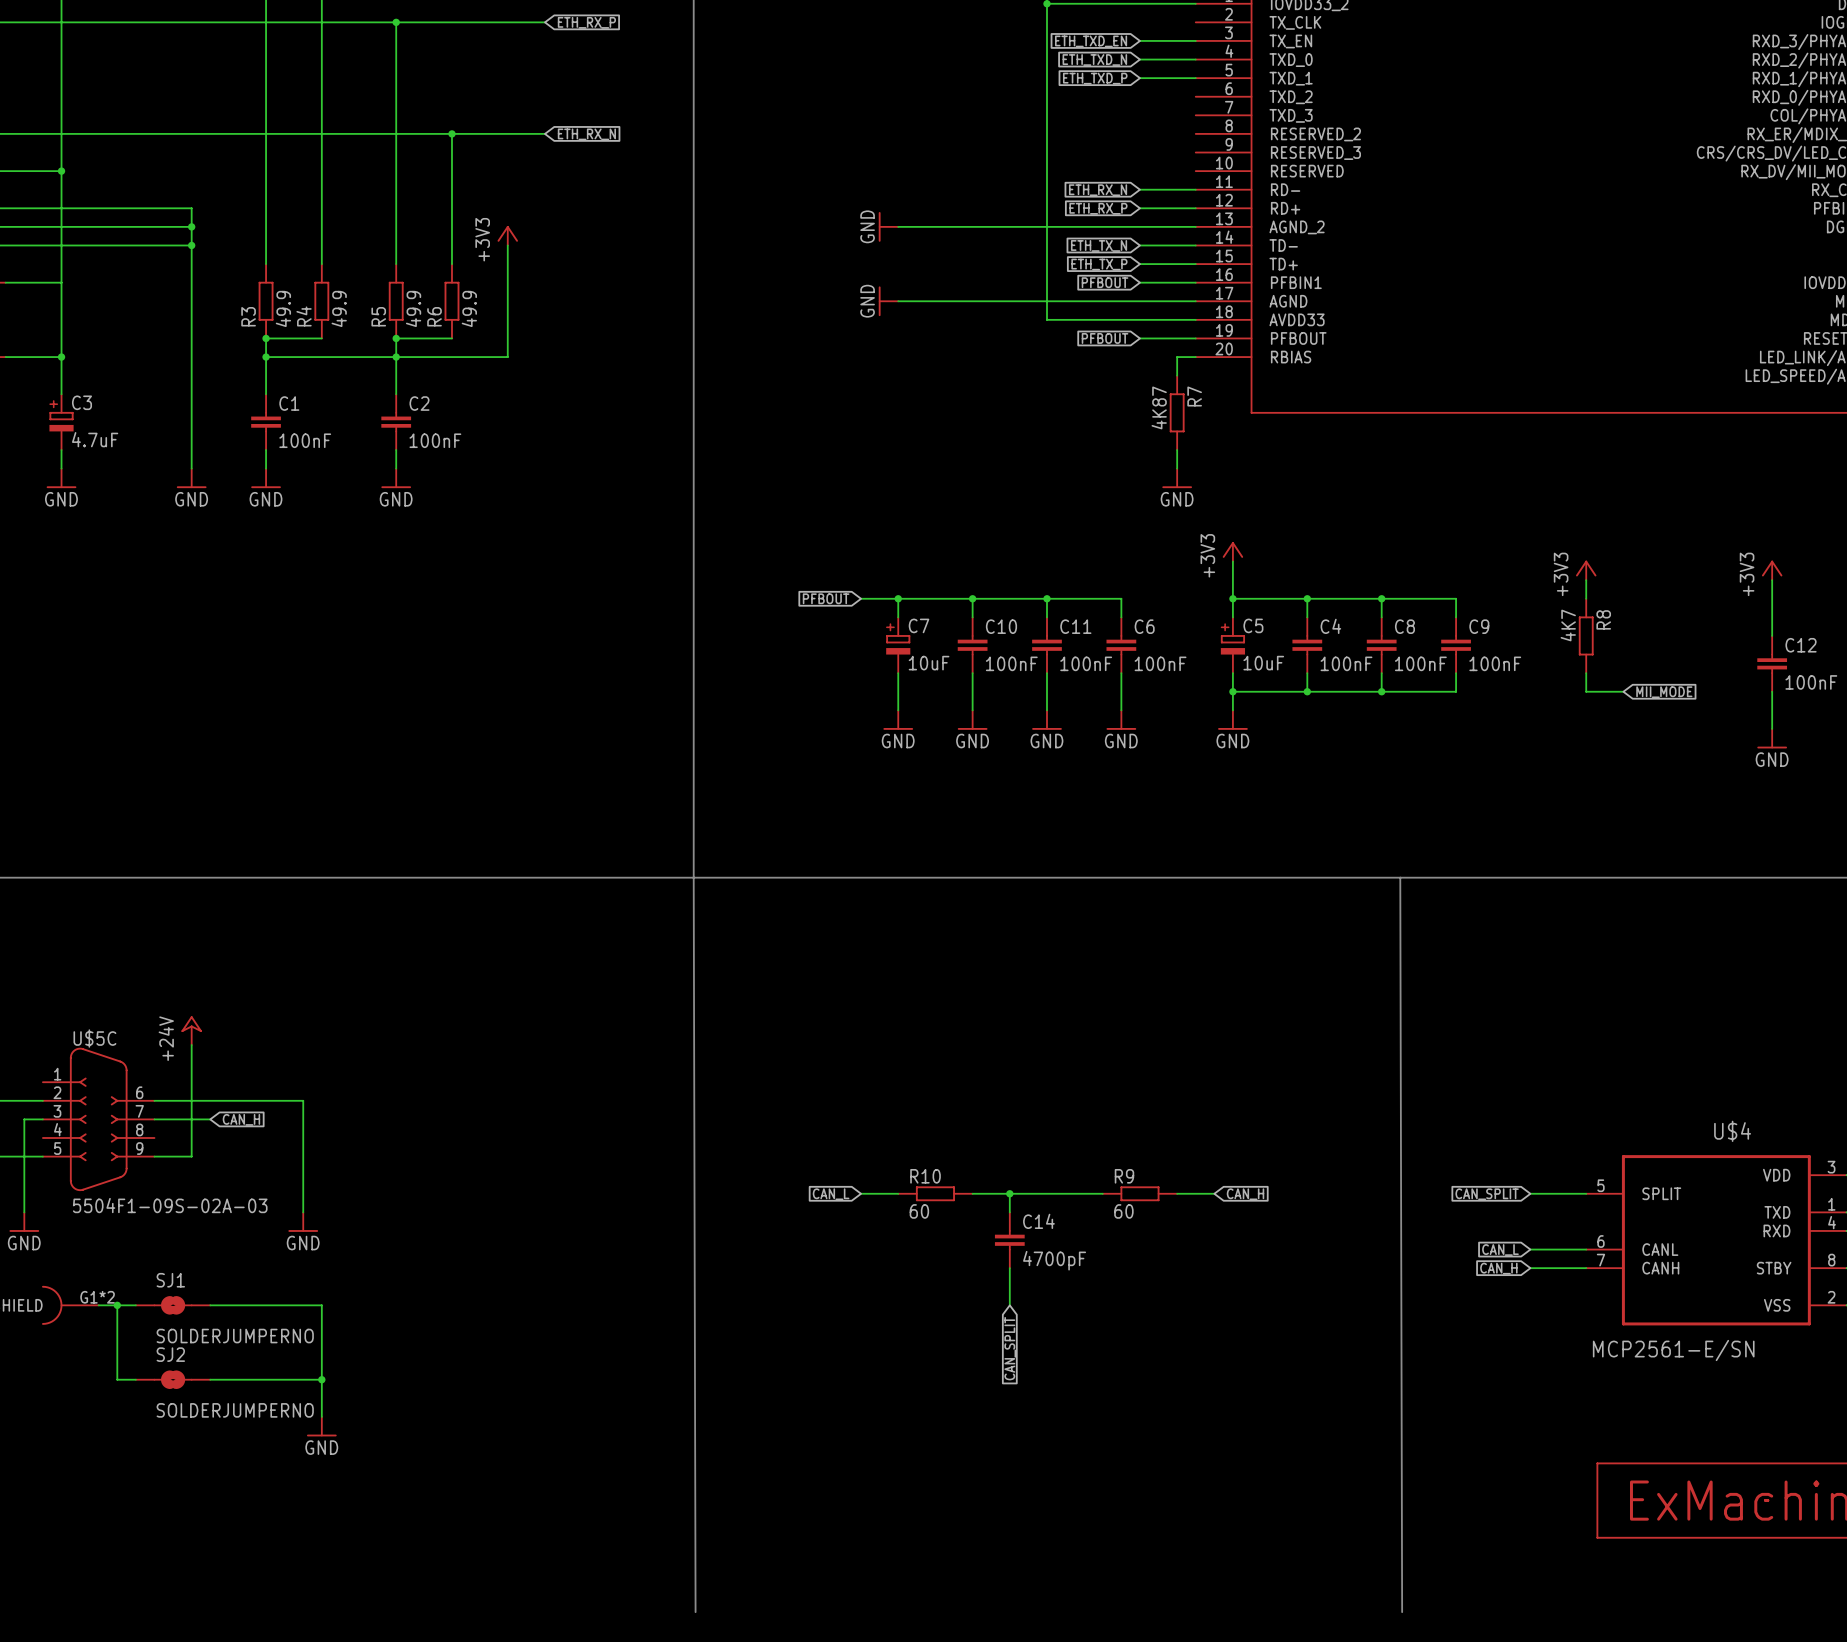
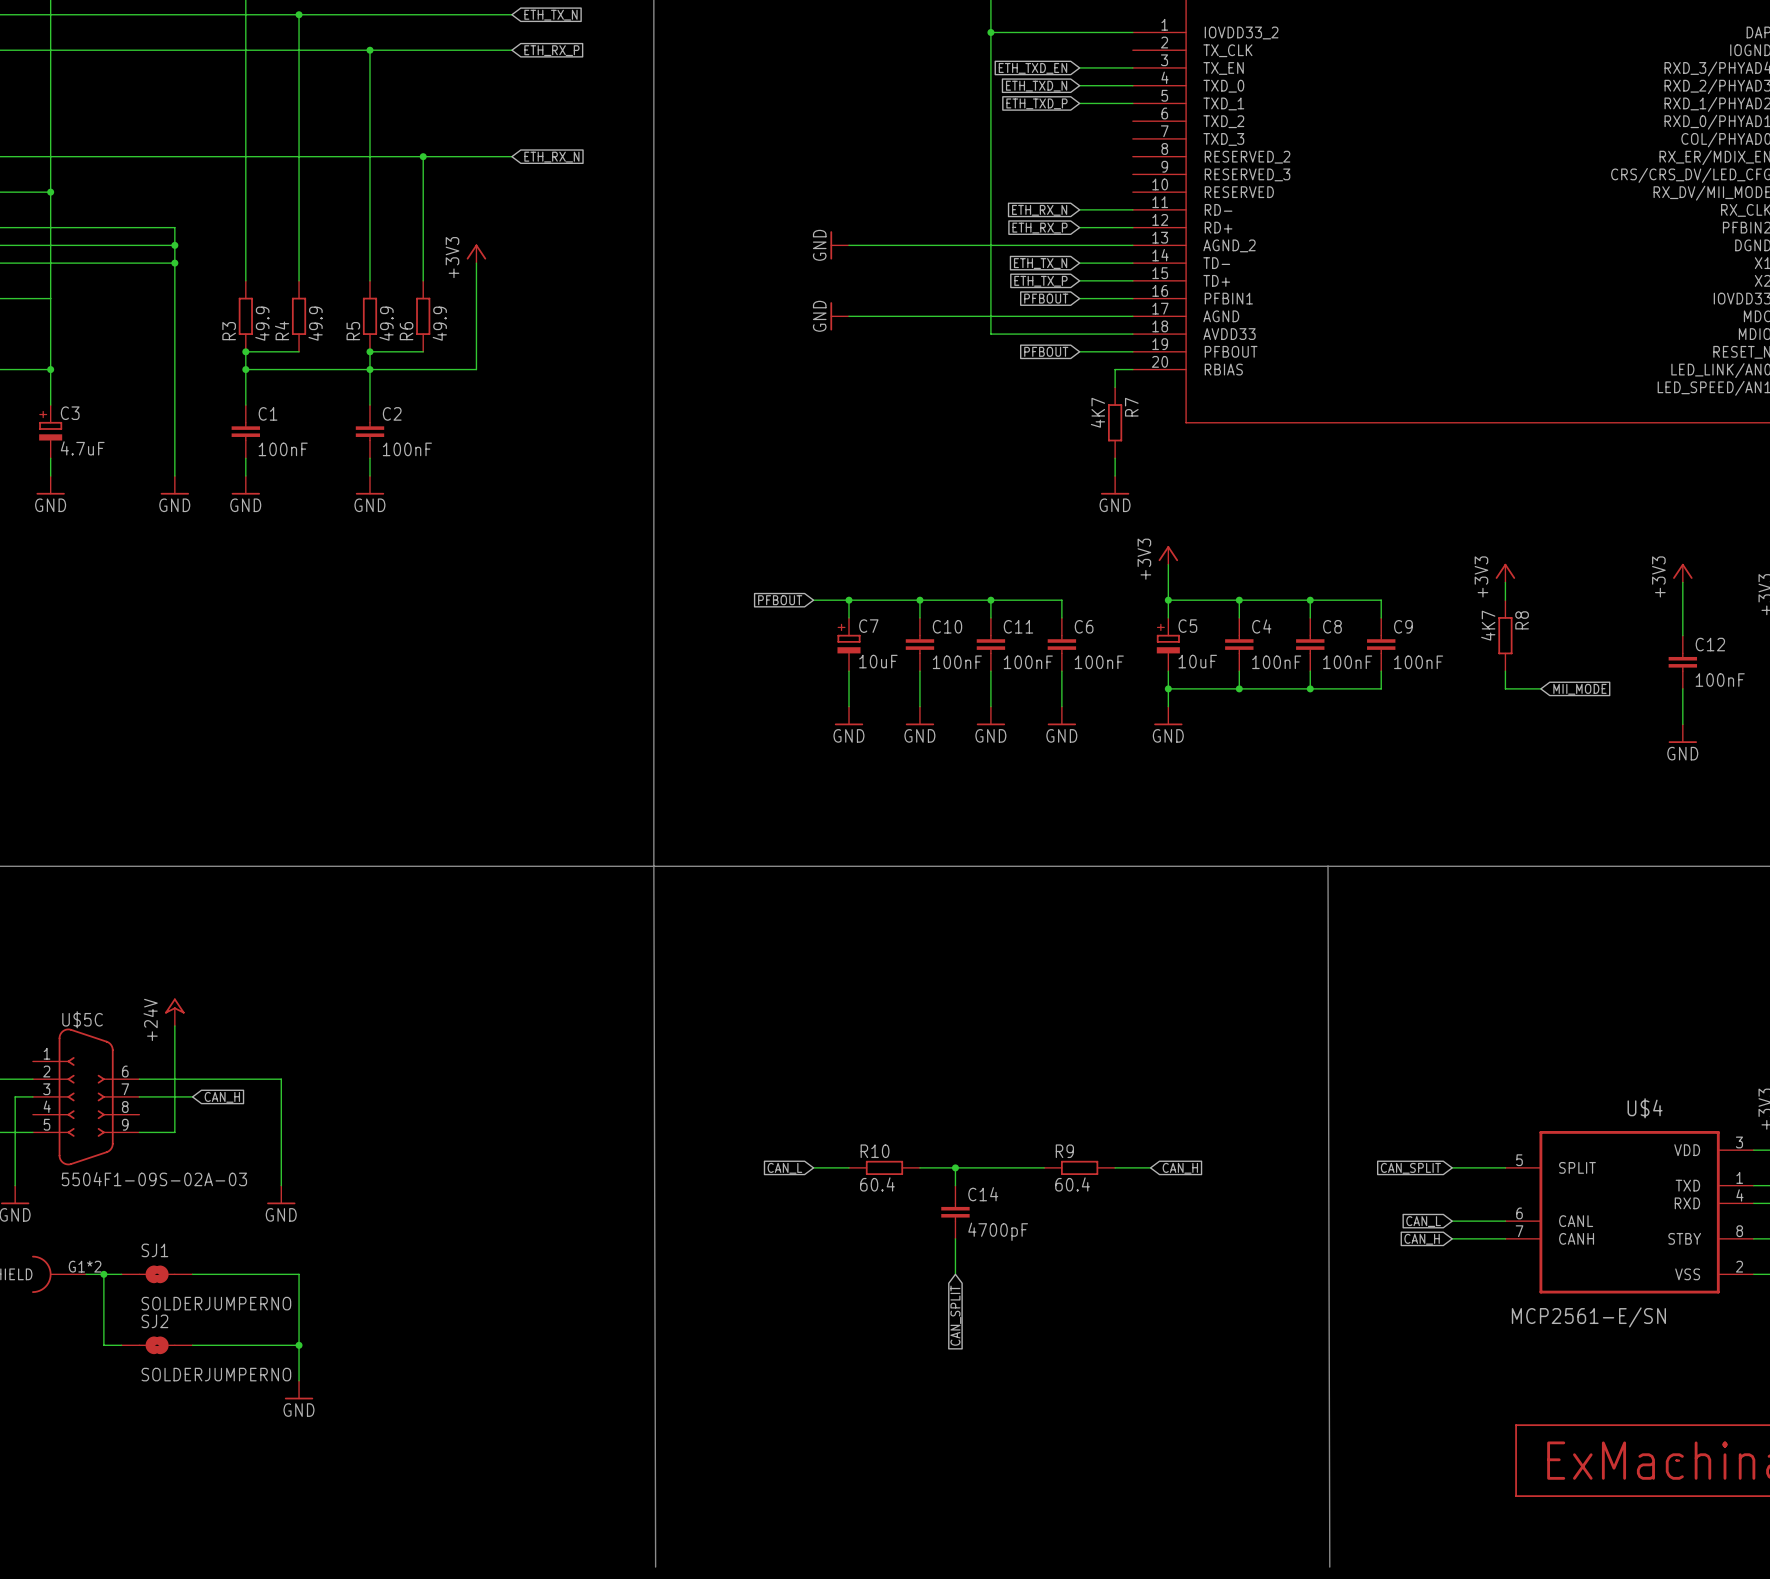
R7 value: 4K87 (1159, 407) -> 4K7 (1097, 412)
R10 value: 60 (919, 1211) -> 60.4 (877, 1184)
R9 value: 60 (1123, 1211) -> 60.4 (1072, 1184)

